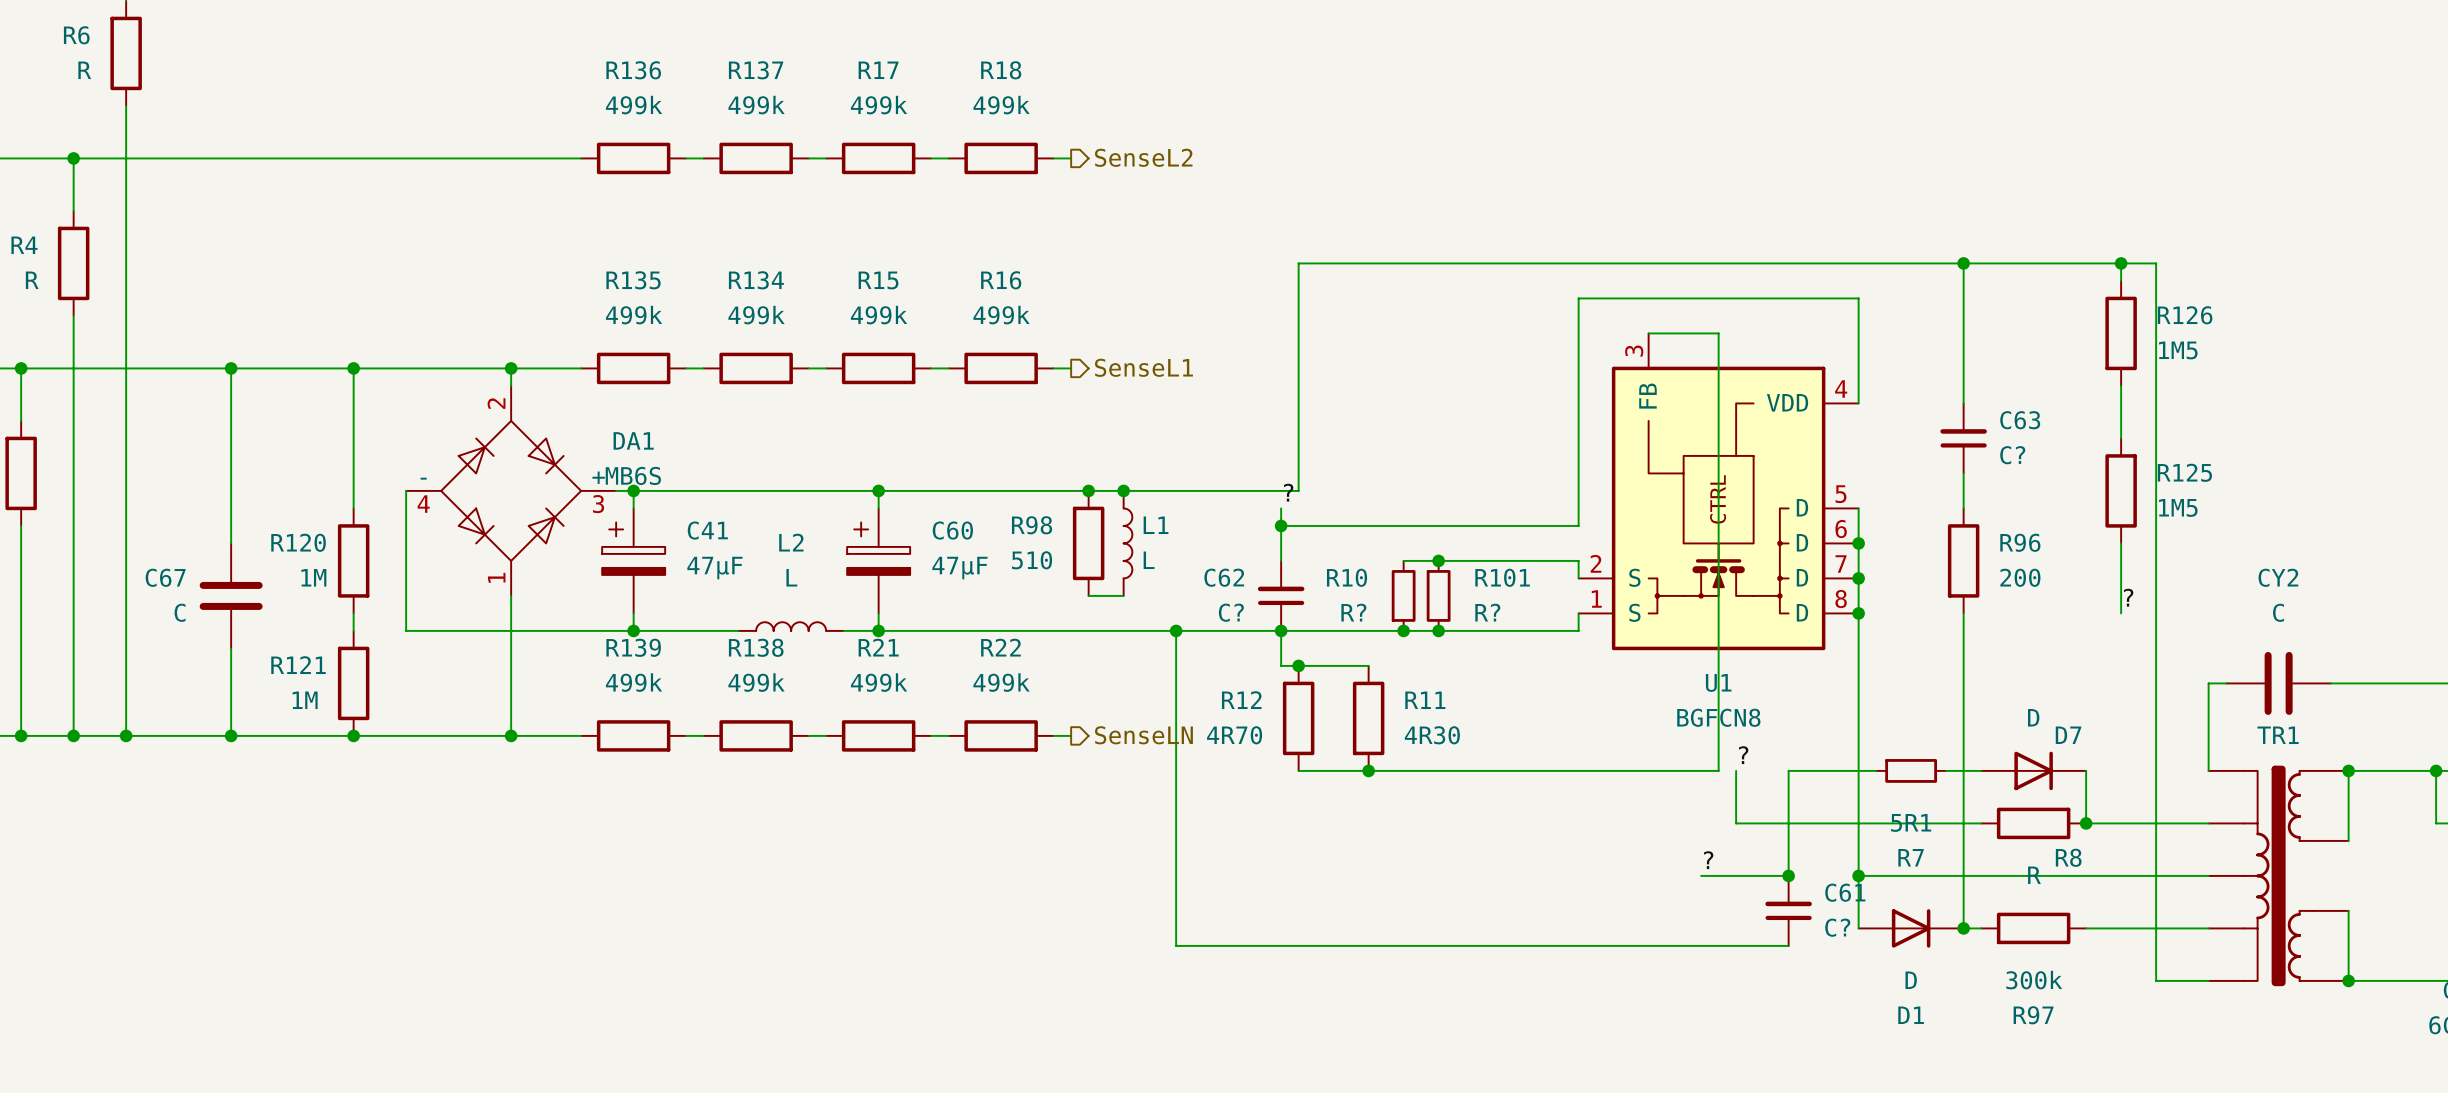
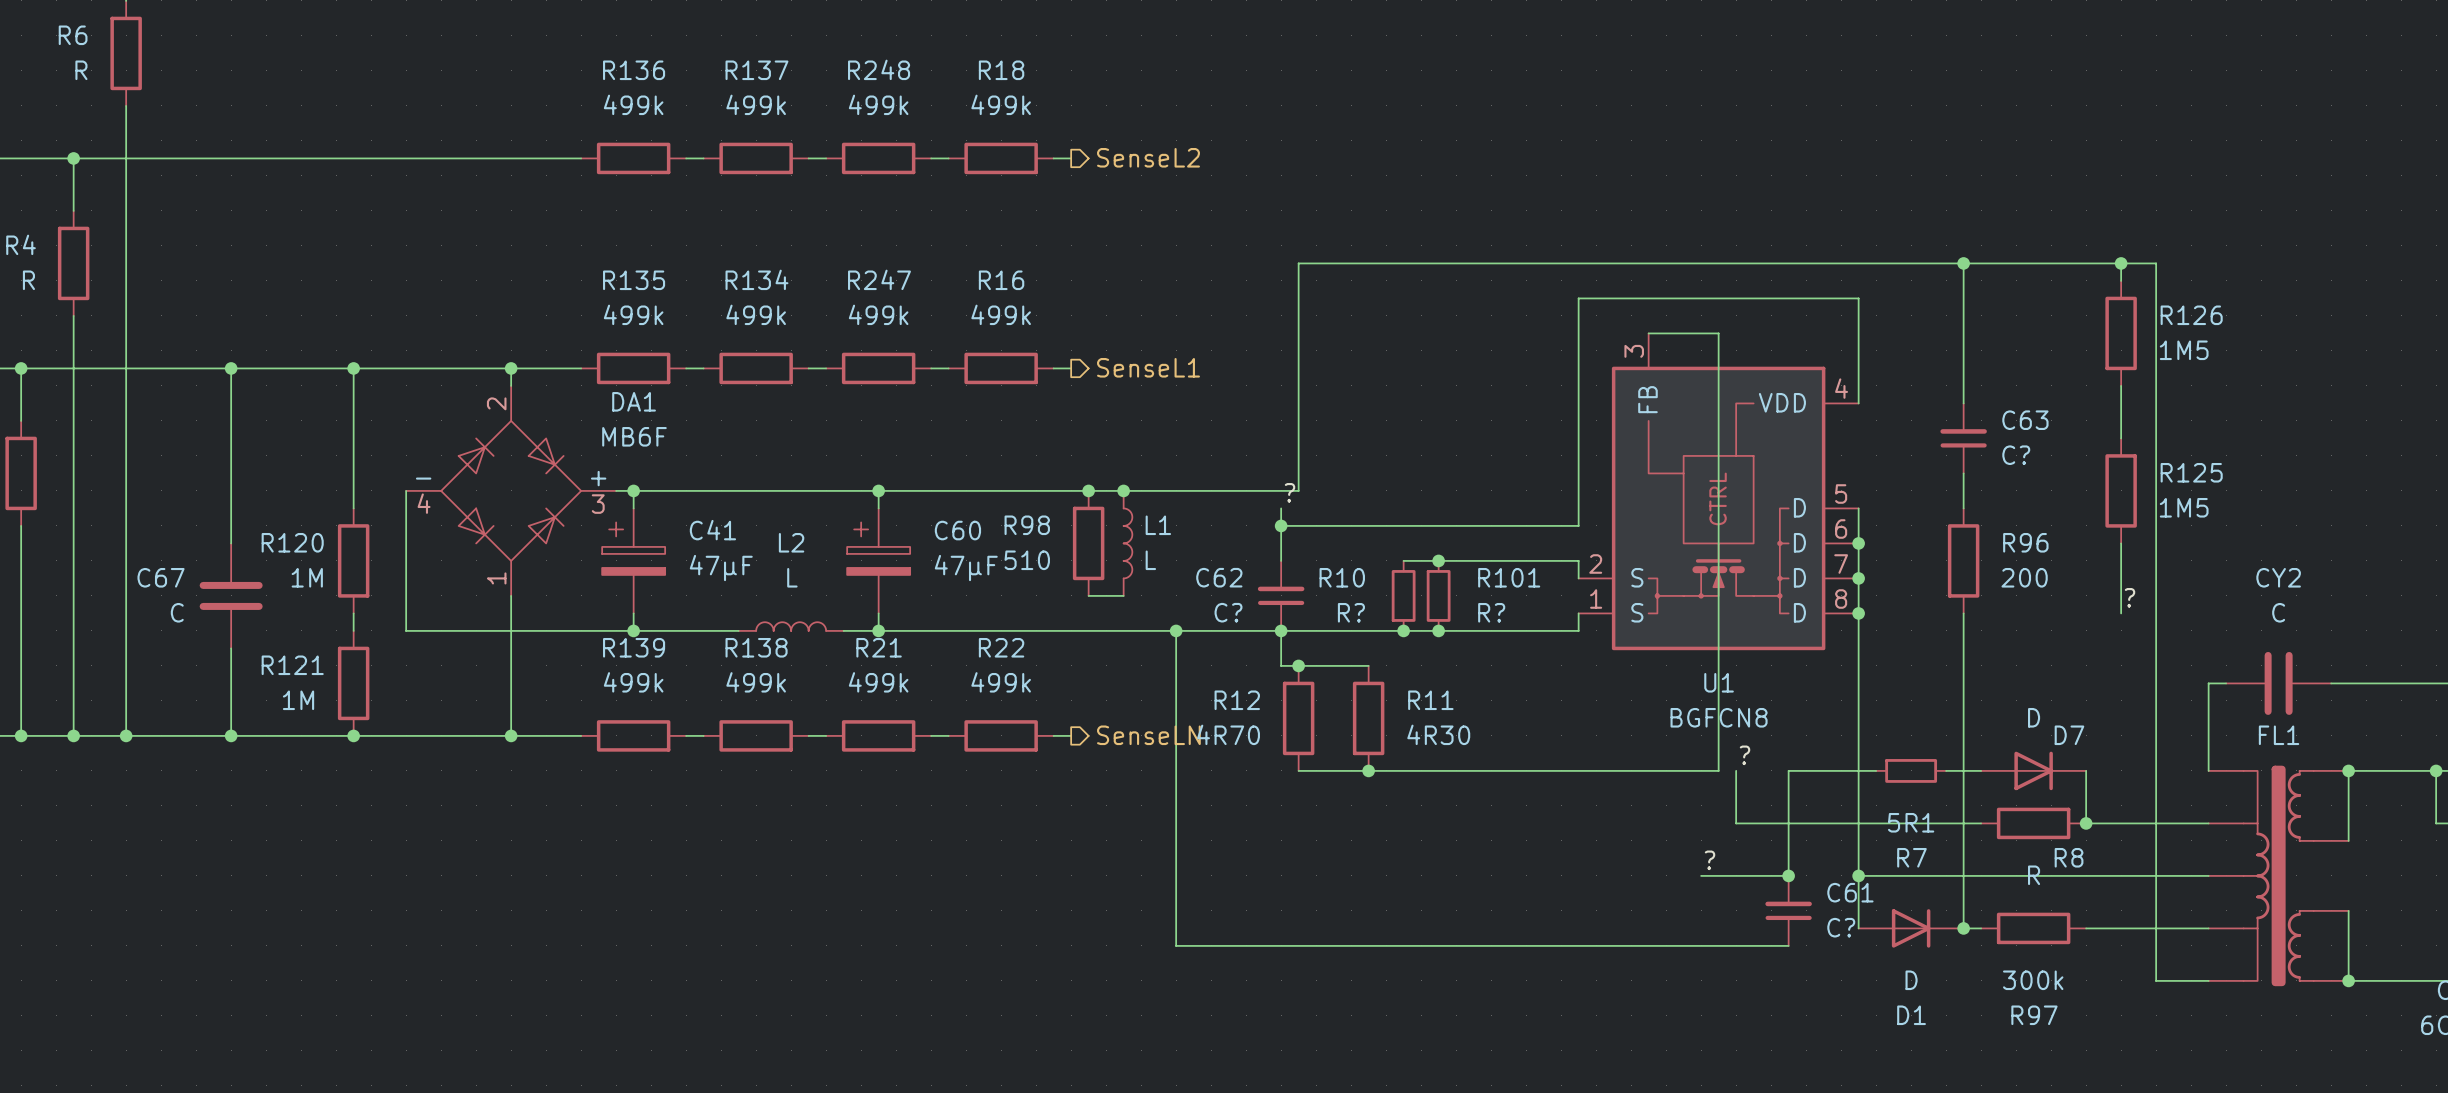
R17 name: R17 (878, 70) -> R248 (879, 69)
R15 name: R15 (878, 280) -> R247 (879, 279)
DA1 name position: DA1 (633, 440) -> DA1 (634, 401)
DA1 value: MB6S (633, 475) -> MB6F (634, 436)
TR1 name: TR1 (2278, 735) -> FL1 (2279, 735)

